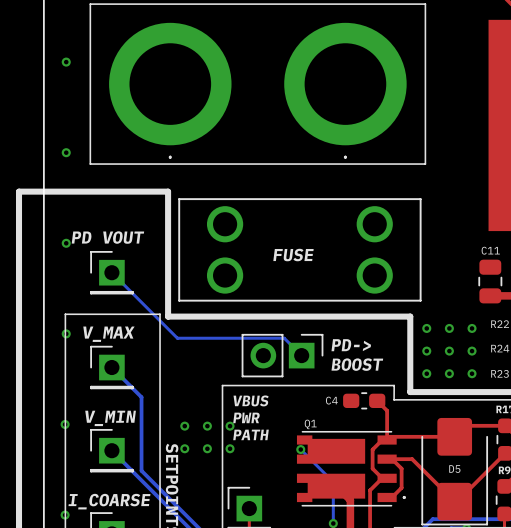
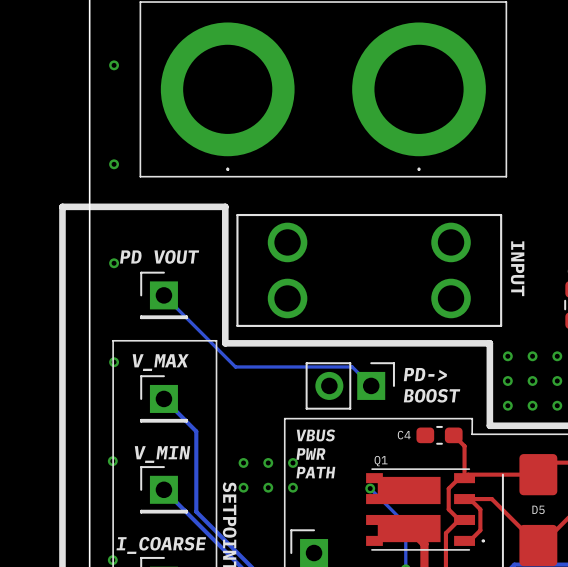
text: none -> INPUT (517, 268)
text: FUSE (293, 255) -> none

